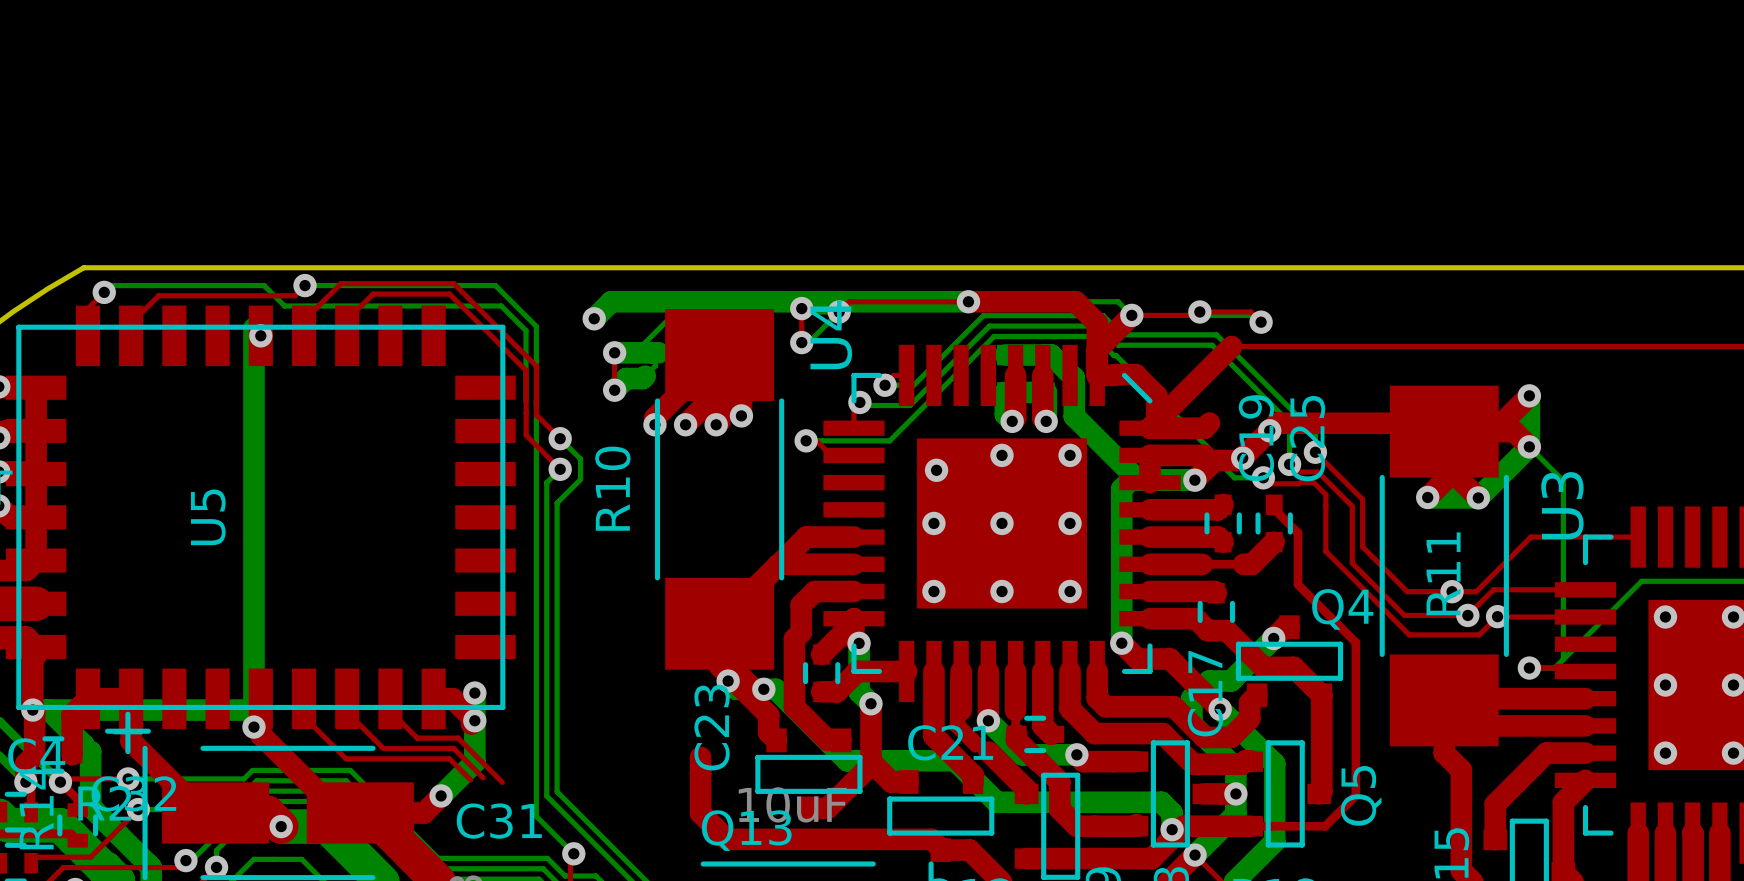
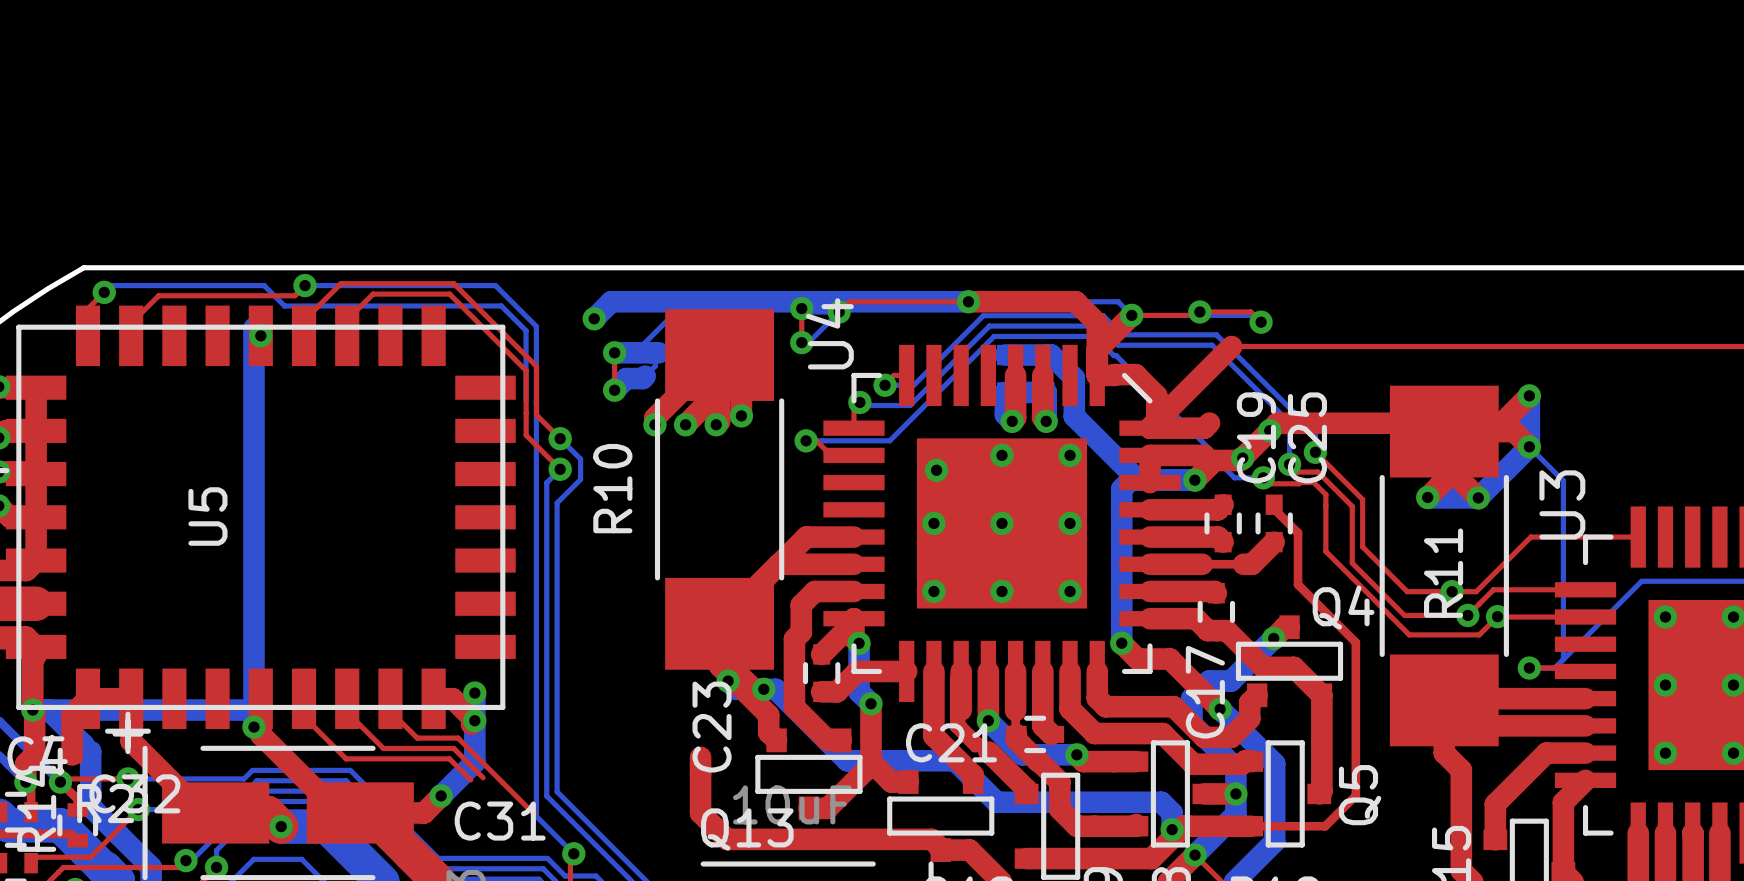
top track: none -> (502, 782) (534, 812)

